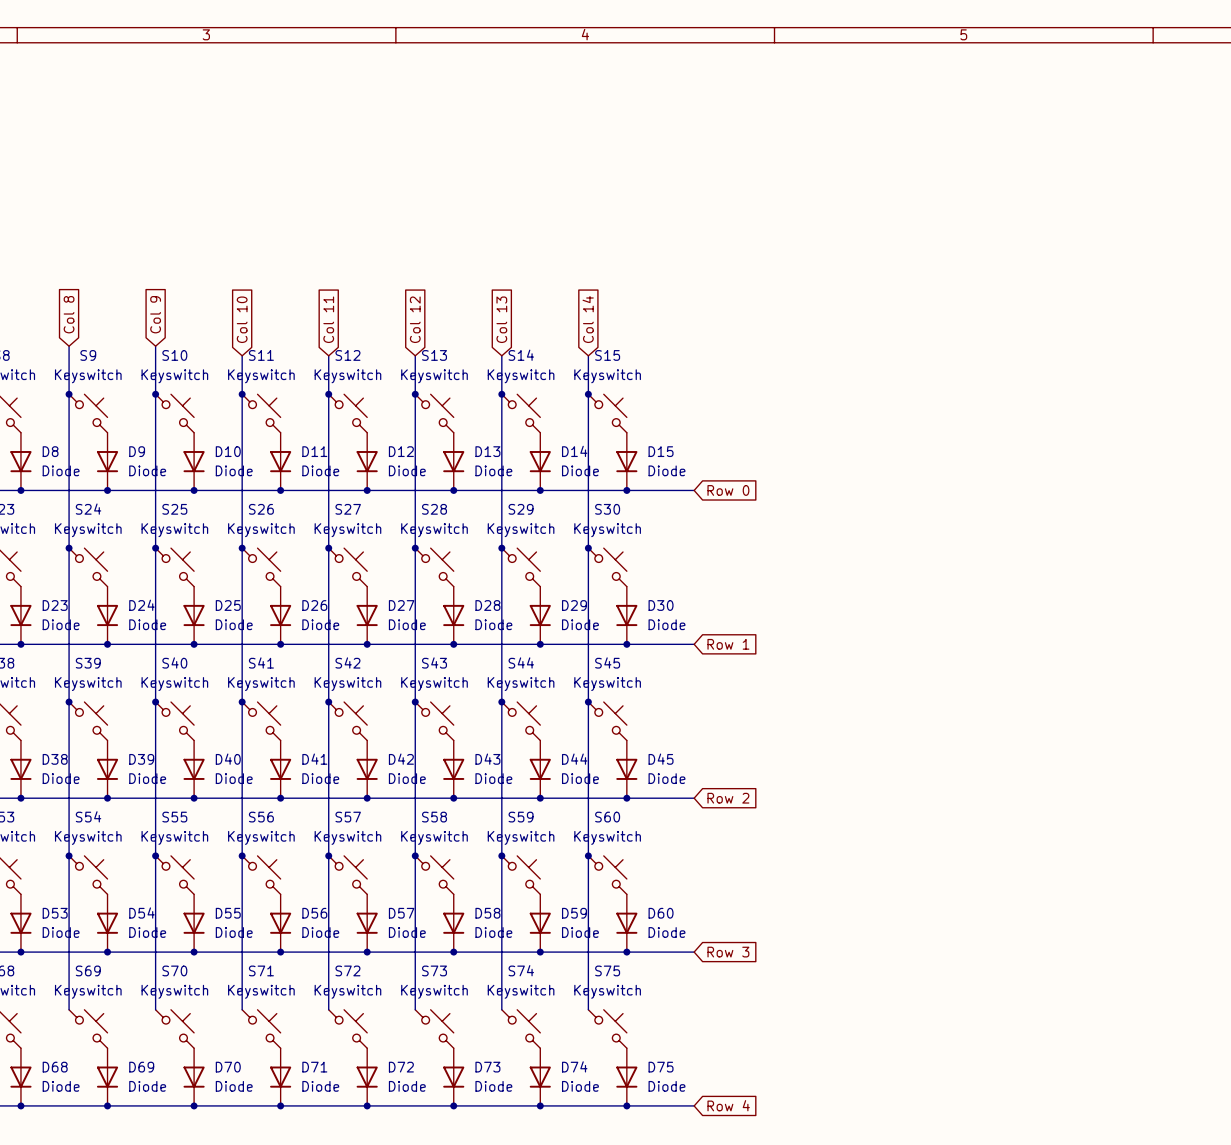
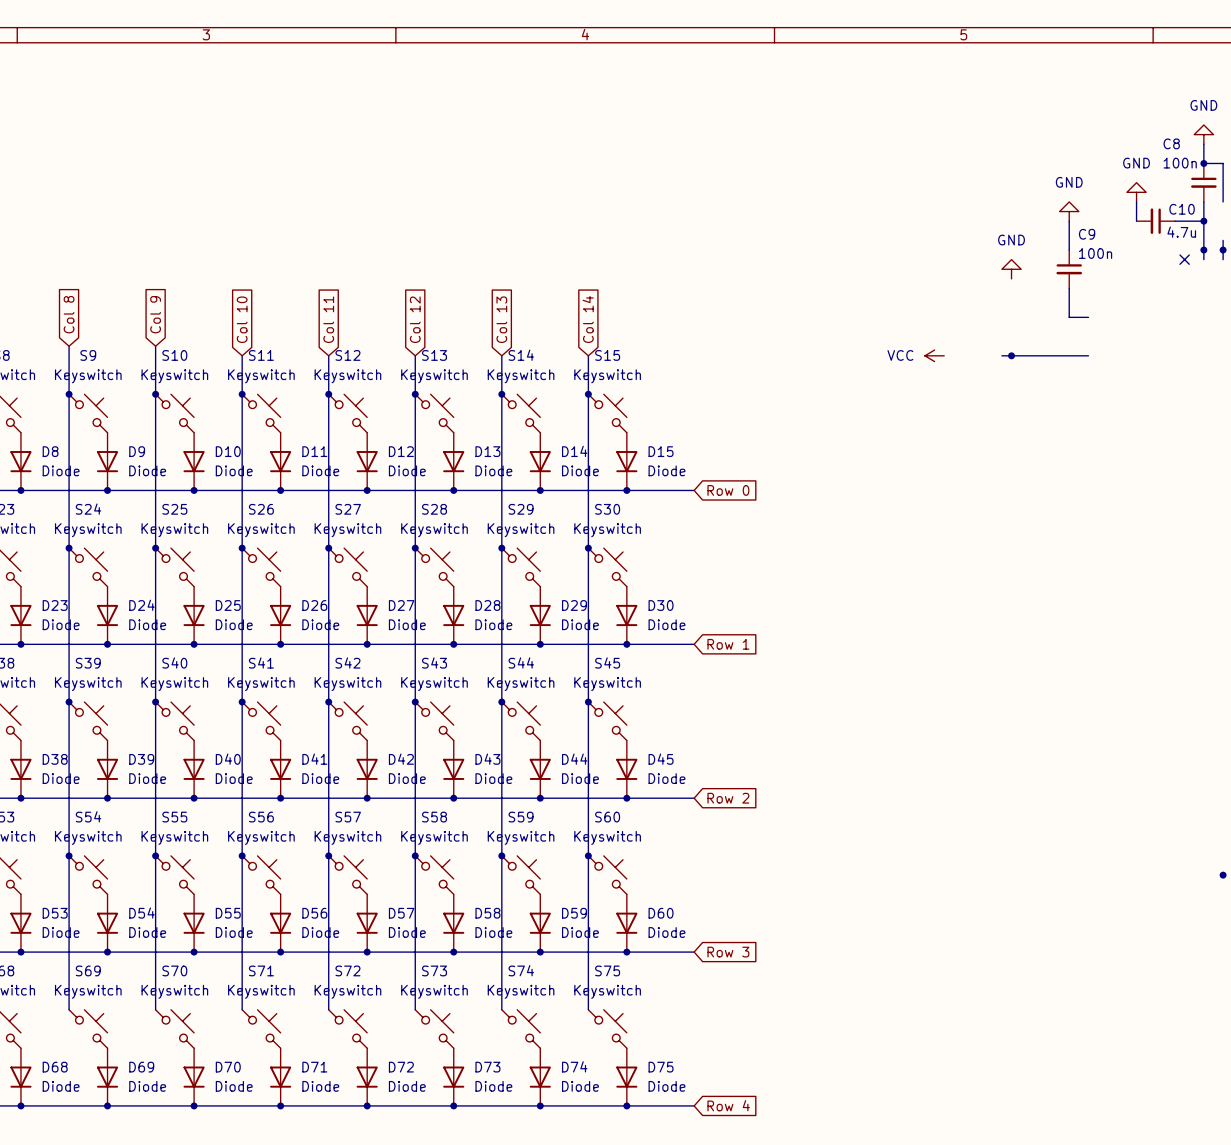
power symbol: none -> GND (1203, 134)
wire: none -> (1203, 144) (1203, 163) (1223, 163) (1223, 201)
junction: none -> (1203, 163)
C8: none -> 100n (1203, 182)
power symbol: none -> GND (1136, 192)
wire: none -> (1136, 201) (1136, 221)
wire: none -> (1203, 201) (1203, 259)
power symbol: none -> GND (1069, 211)
wire: none -> (1069, 221) (1069, 250)
C10: none -> 4.7u (1155, 221)
wire: none -> (1175, 221) (1203, 221)
junction: none -> (1203, 221)
wire: none -> (1223, 240) (1223, 259)
junction: none -> (1203, 250)
junction: none -> (1223, 250)
no-connect mark: none -> (1184, 259)
power symbol: none -> GND (1011, 269)
C9: none -> 100n (1069, 269)
wire: none -> (1069, 288) (1069, 317) (1088, 317)
power symbol: none -> VCC (934, 355)
wire: none -> (1001, 355) (1088, 355)
junction: none -> (1011, 355)
junction: none -> (1223, 875)

